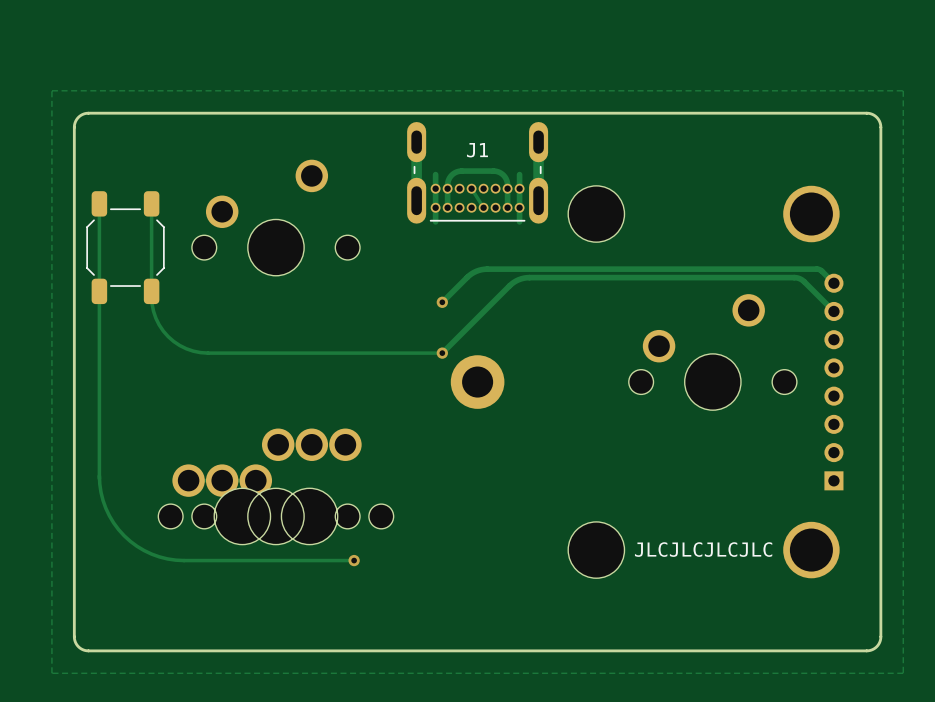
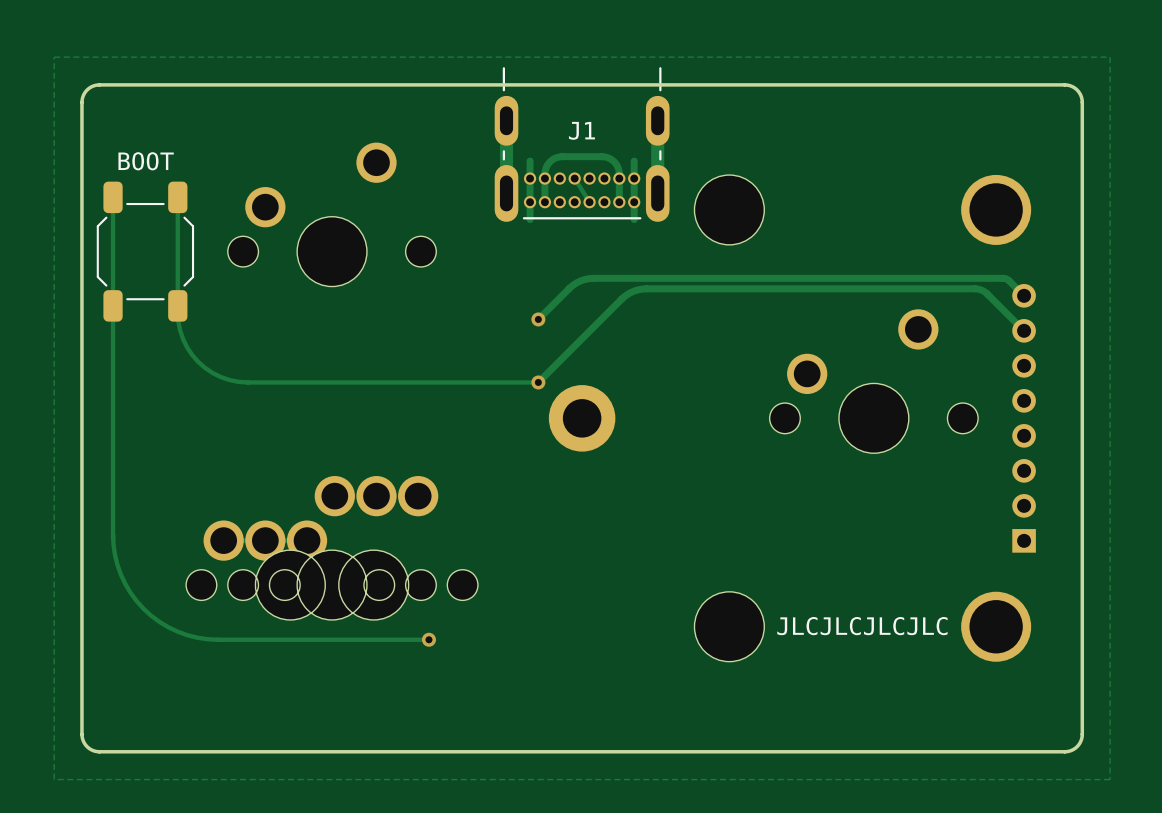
J1 footprint: [407, 122, 549, 224] -> [494, 67, 670, 222]
part value: none -> BOOT (146, 161)
part footprint: [239, 428, 394, 545] -> [269, 476, 478, 620]
part: (226, 486) -> none
part: none -> (290, 547)

